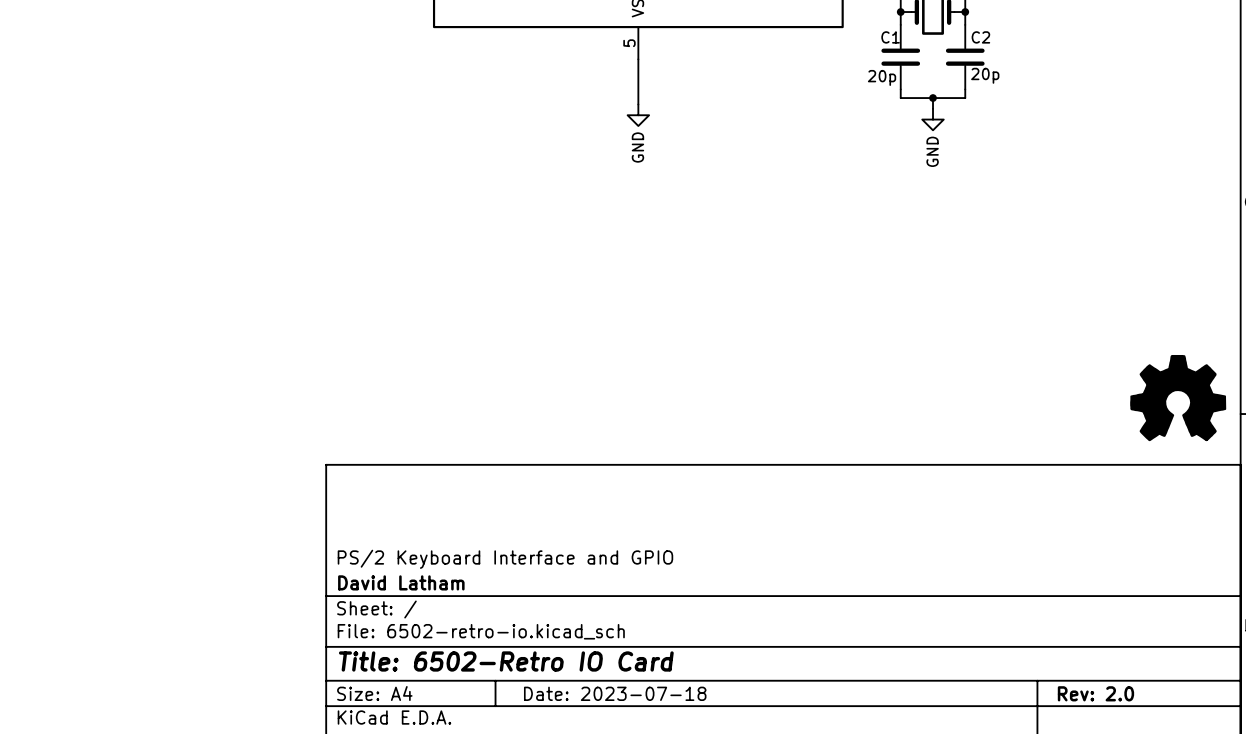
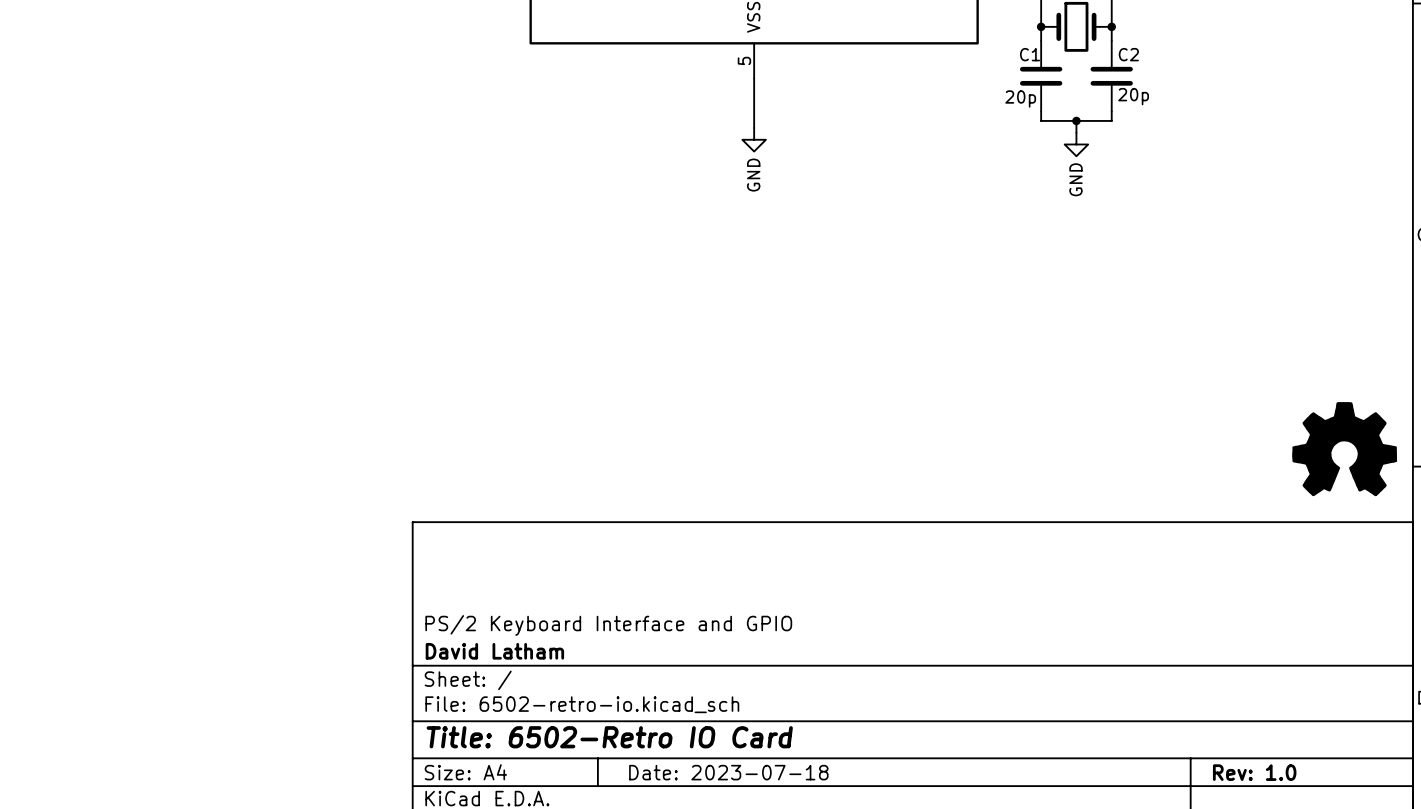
title block: Rev: 2.0 (1095, 693) -> Rev: 1.0 (1254, 772)

